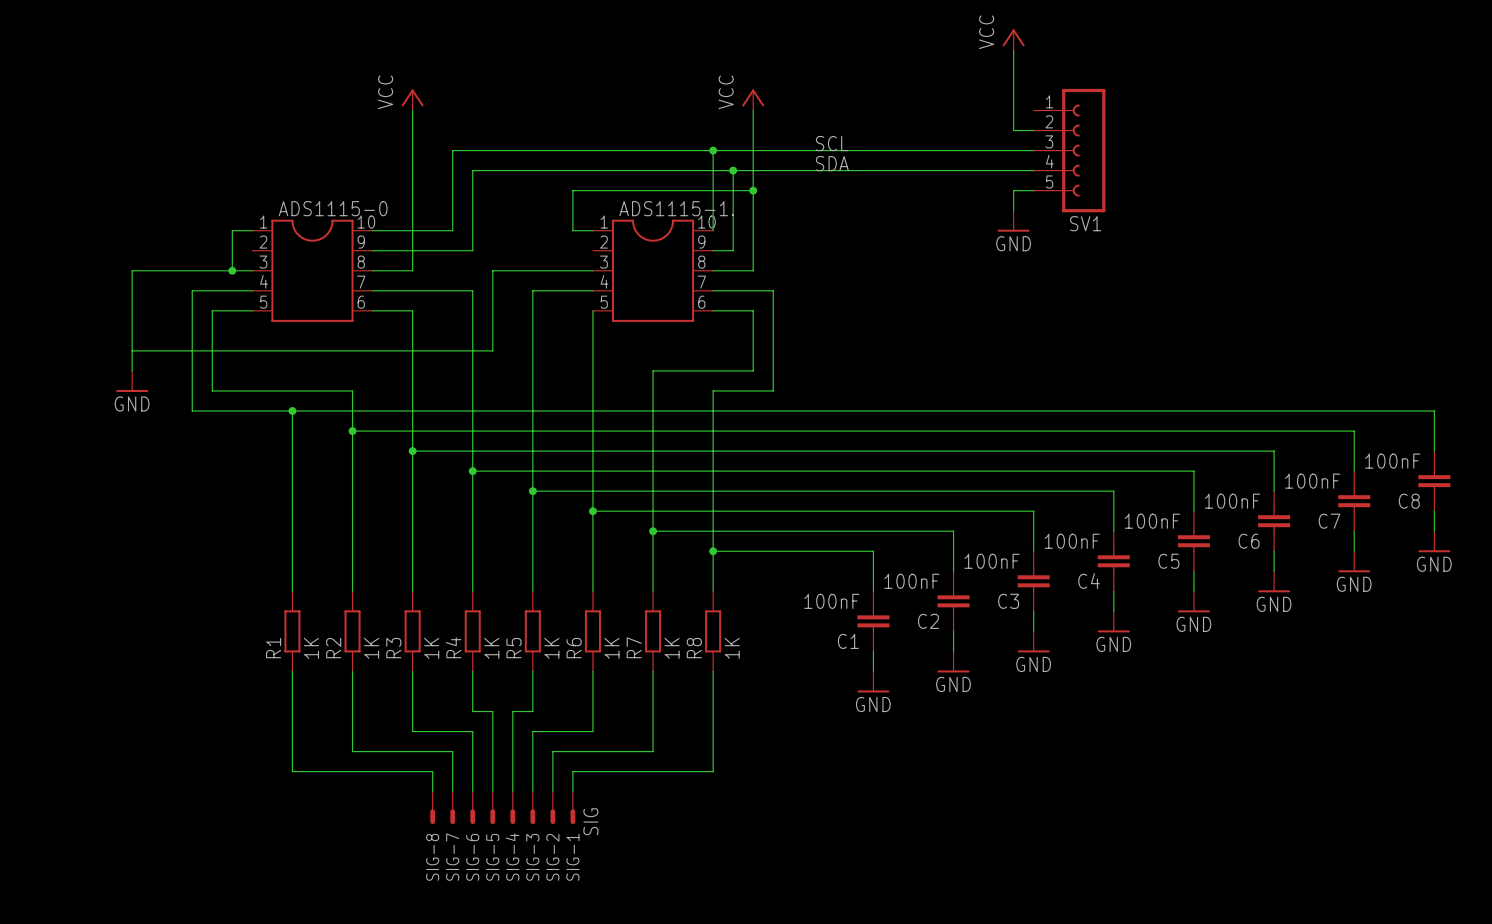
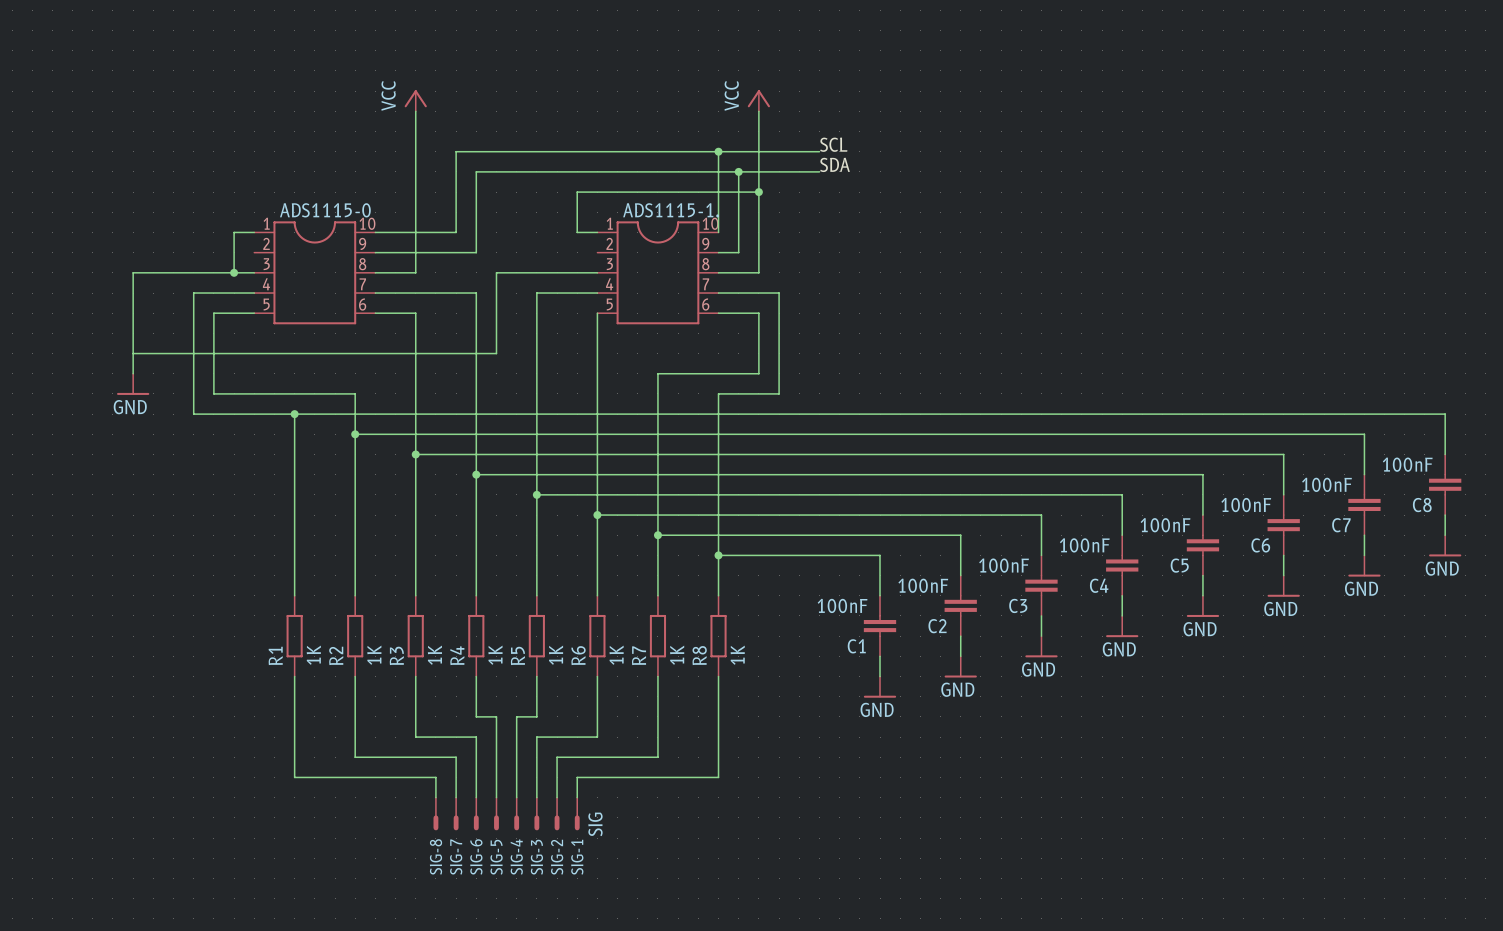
power symbol: VCC (1013, 39) -> none
wire: (1013, 50) (1013, 130) (1033, 130) -> none
wire: (813, 150) (1033, 150) -> none
SV1: (1069, 150) -> none
wire: (813, 170) (1033, 170) -> none
wire: (1033, 190) (1013, 190) (1013, 210) -> none
power symbol: GND (1013, 221) -> none

